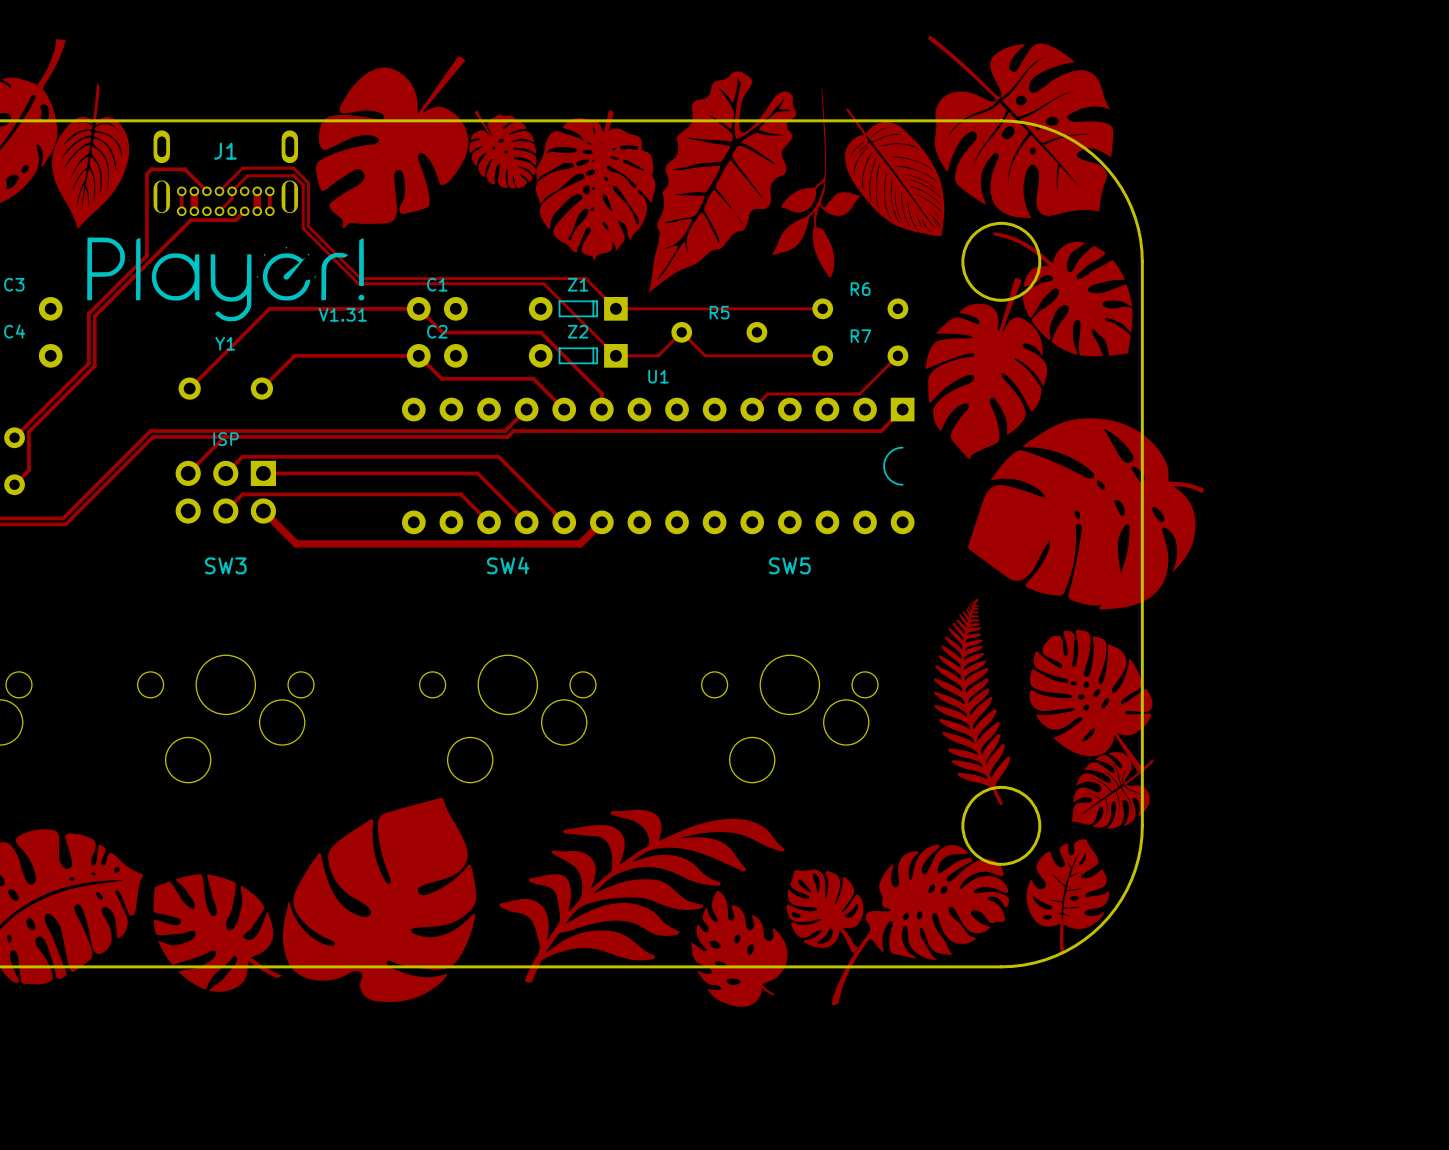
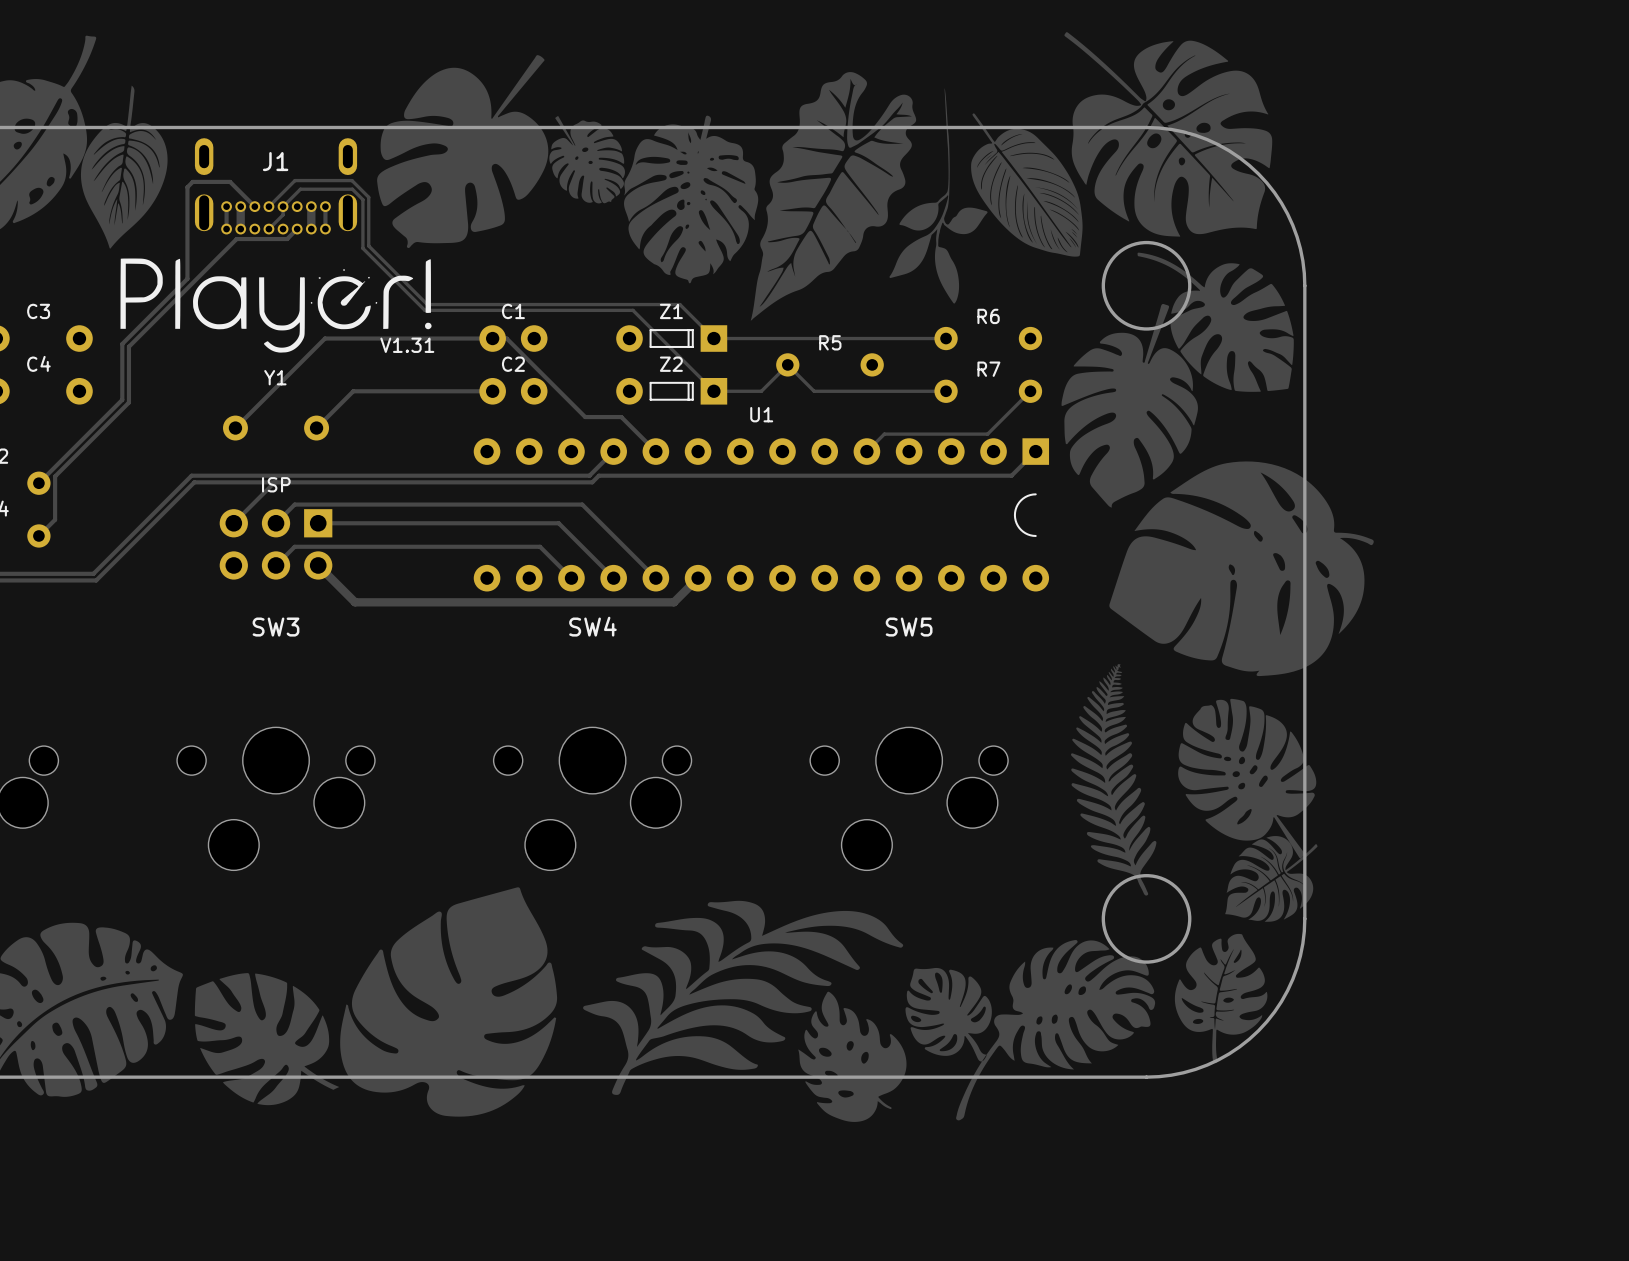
track: (418, 308) (442, 332) (540, 332) (601, 393) (601, 409) -> none
track: (418, 355) (441, 378) (501, 378) -> (492, 338) (506, 338) (585, 417)

